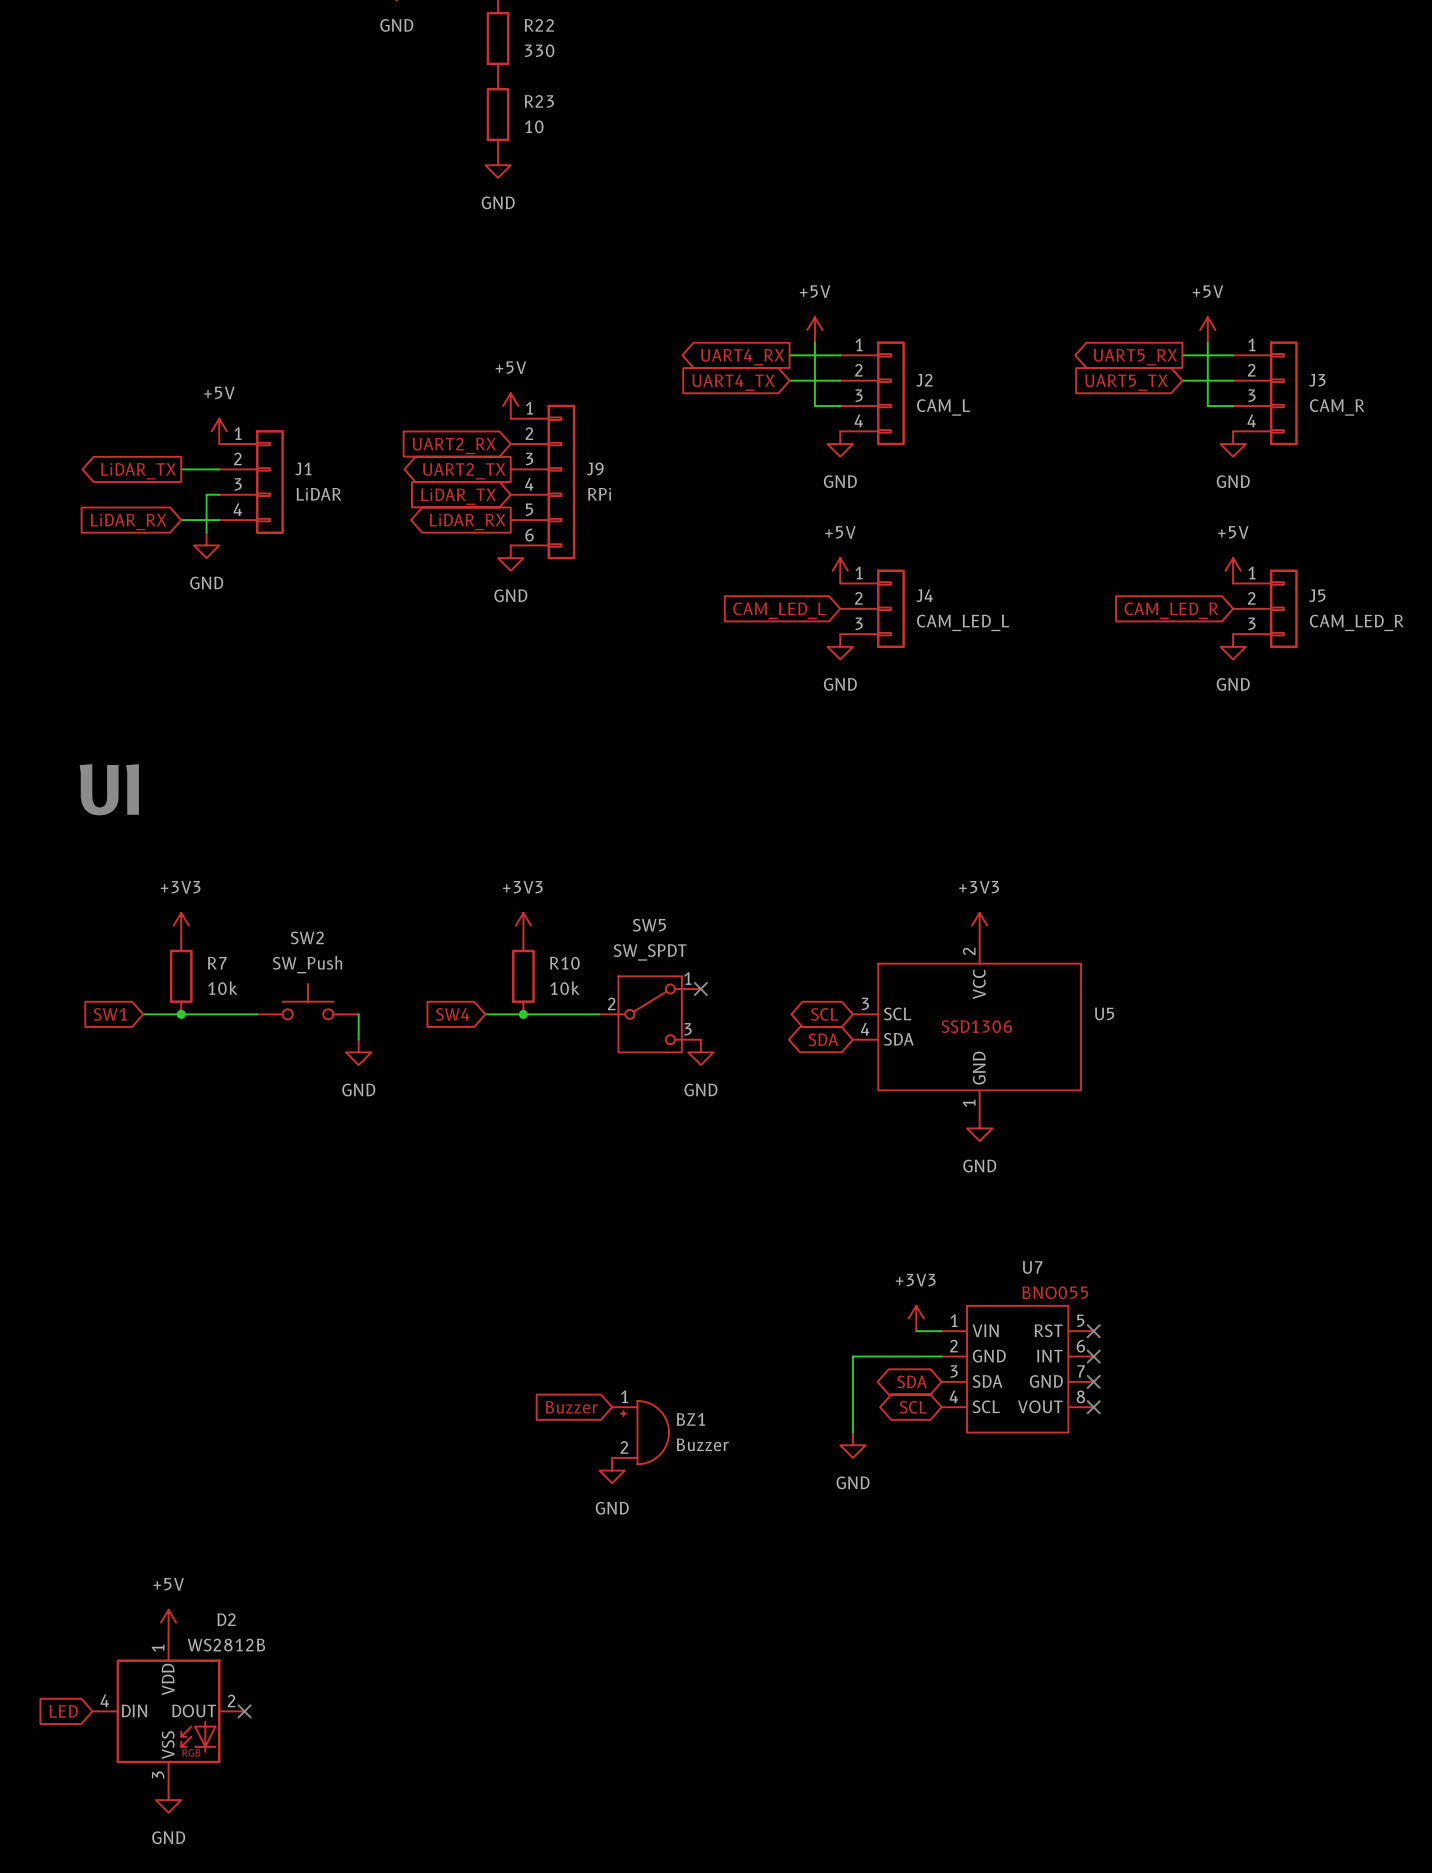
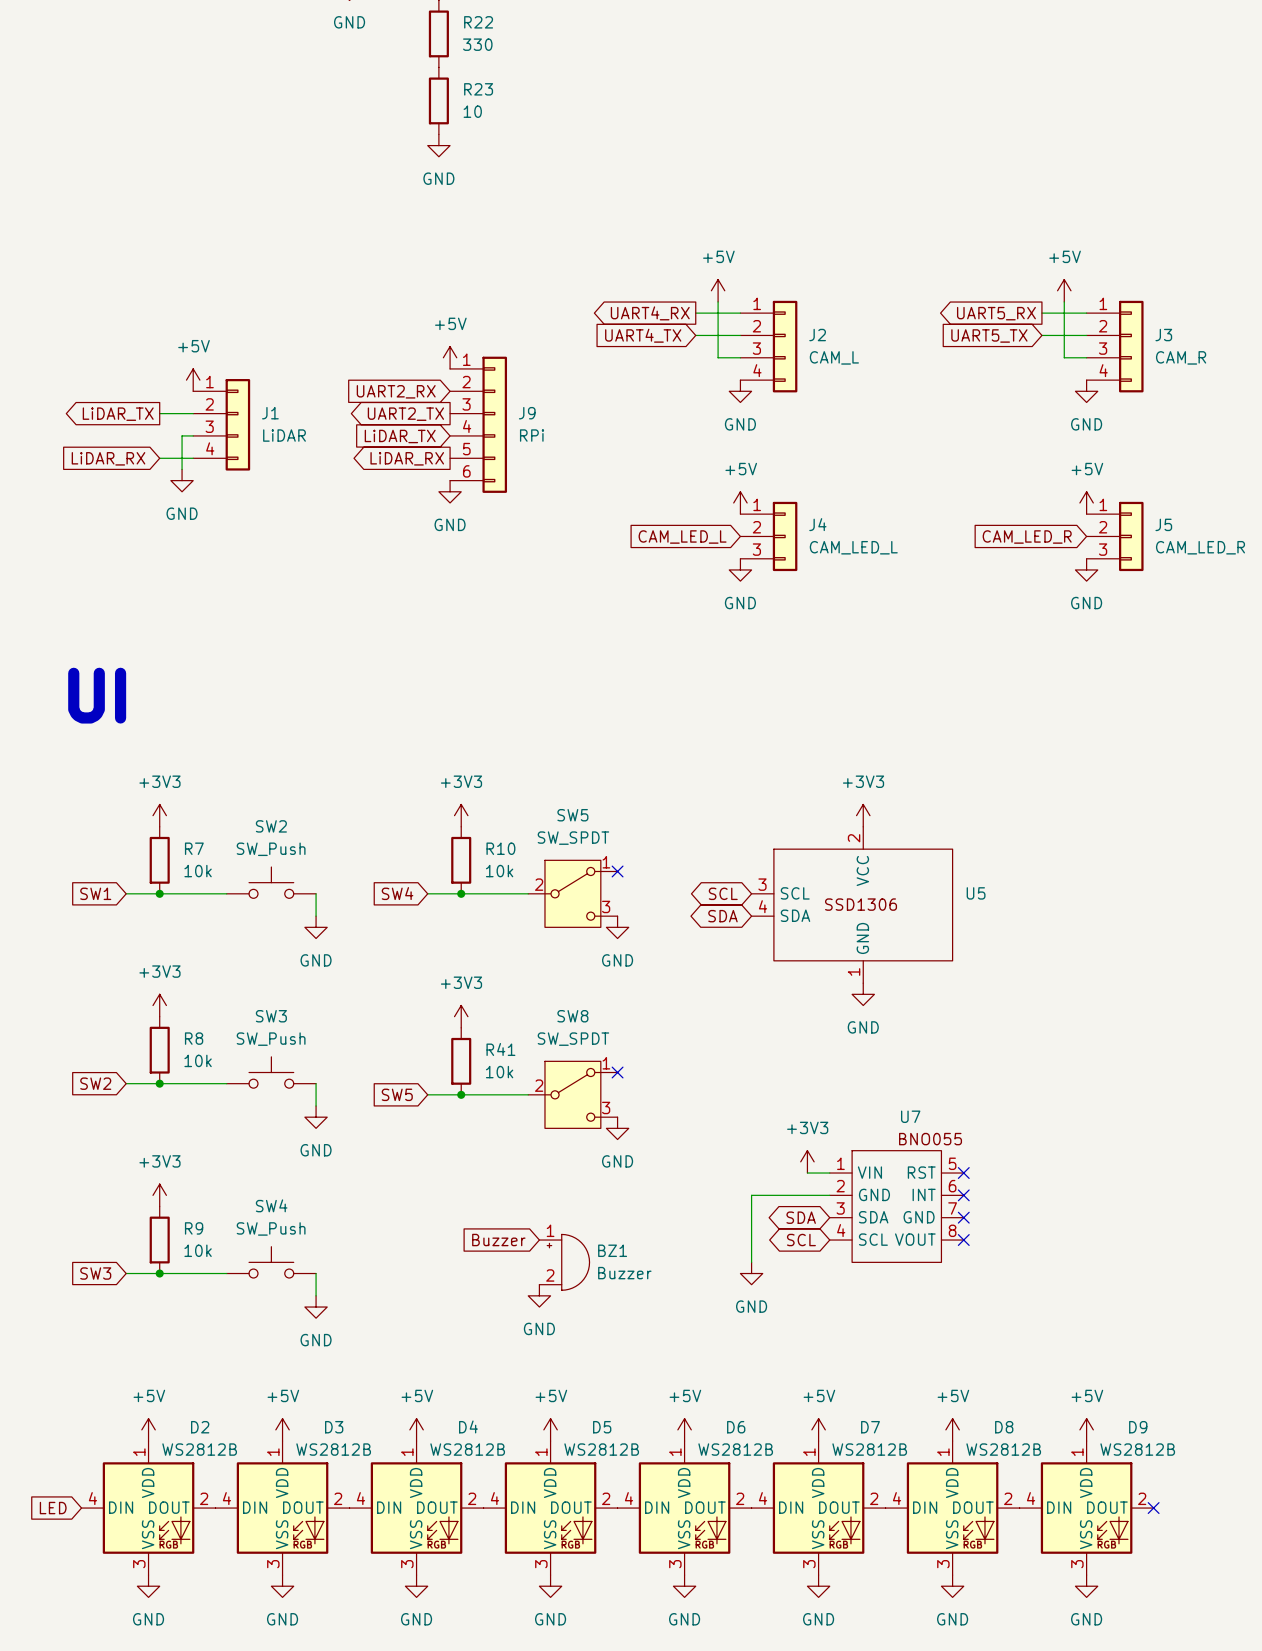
power symbol: none -> +3V3 (159, 1005)
power symbol: none -> +3V3 (461, 1016)
R8: none -> 10k (159, 1050)
R41: none -> 10k (461, 1061)
SW3: none -> SW_Push (271, 1072)
no-connect mark: none -> (617, 1072)
global label: none -> SW2 (95, 1083)
wire: none -> (126, 1083) (226, 1083)
junction: none -> (159, 1083)
wire: none -> (316, 1083) (316, 1106)
global label: none -> SW5 (397, 1094)
wire: none -> (427, 1094) (528, 1094)
junction: none -> (461, 1094)
SW8: none -> SW_SPDT (572, 1094)
power symbol: none -> GND (316, 1117)
power symbol: none -> GND (617, 1128)
power symbol: none -> +3V3 (159, 1195)
R9: none -> 10k (159, 1240)
SW4: none -> SW_Push (271, 1262)
global label: none -> SW3 (95, 1273)
wire: none -> (126, 1273) (226, 1273)
junction: none -> (159, 1273)
wire: none -> (316, 1273) (316, 1295)
power symbol: none -> GND (316, 1307)
power symbol: none -> +5V (282, 1429)
power symbol: none -> +5V (416, 1429)
power symbol: none -> +5V (550, 1429)
power symbol: none -> +5V (684, 1429)
power symbol: none -> +5V (818, 1429)
power symbol: none -> +5V (952, 1429)
power symbol: none -> +5V (1086, 1429)
no-connect mark: (244, 1711) -> none
D3: none -> WS2812B (282, 1508)
D4: none -> WS2812B (416, 1508)
D5: none -> WS2812B (550, 1508)
D6: none -> WS2812B (684, 1508)
D7: none -> WS2812B (818, 1508)
D8: none -> WS2812B (952, 1508)
D9: none -> WS2812B (1086, 1508)
no-connect mark: none -> (1153, 1508)
power symbol: none -> GND (282, 1586)
power symbol: none -> GND (416, 1586)
power symbol: none -> GND (550, 1586)
power symbol: none -> GND (684, 1586)
power symbol: none -> GND (818, 1586)
power symbol: none -> GND (952, 1586)
power symbol: none -> GND (1086, 1586)

